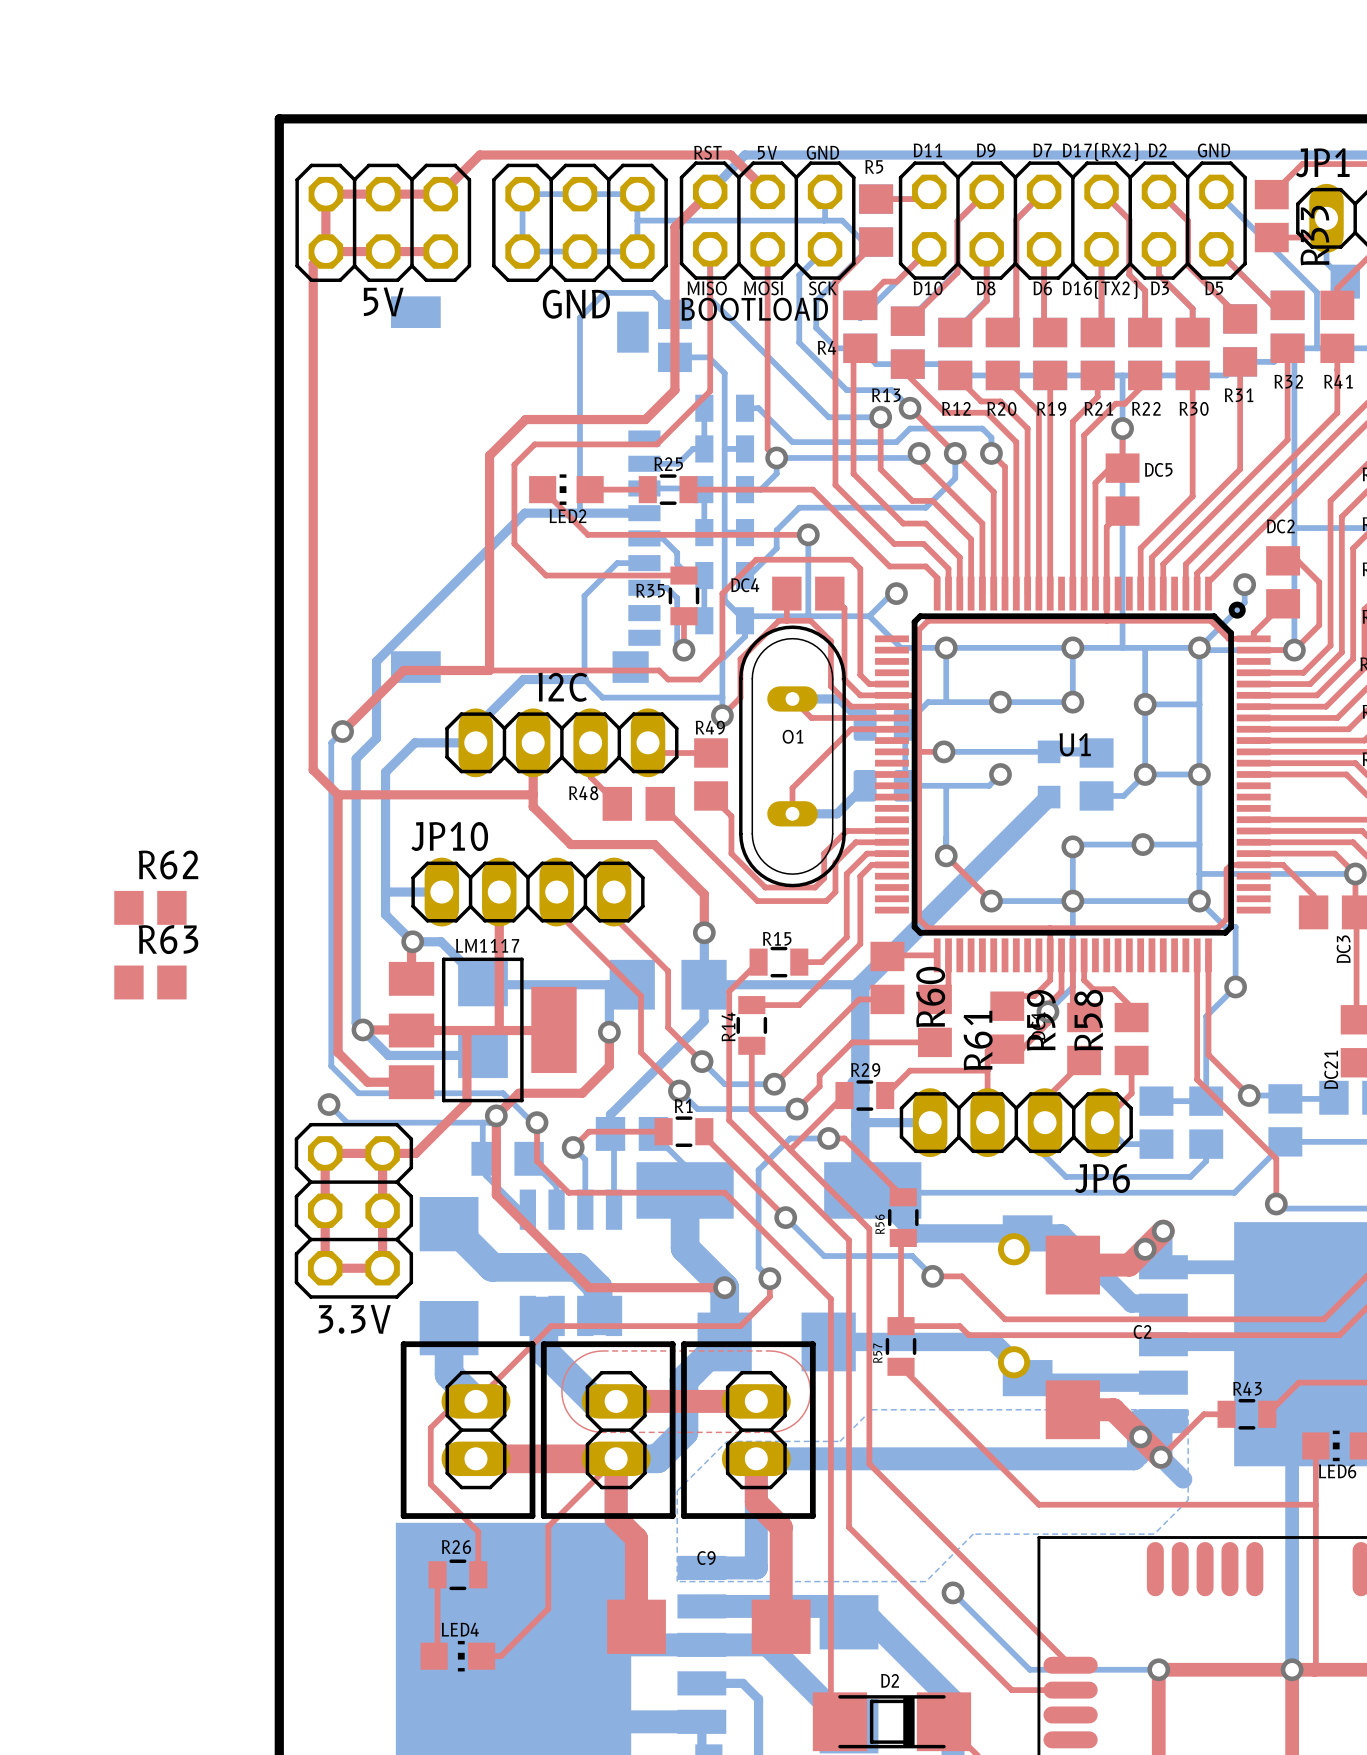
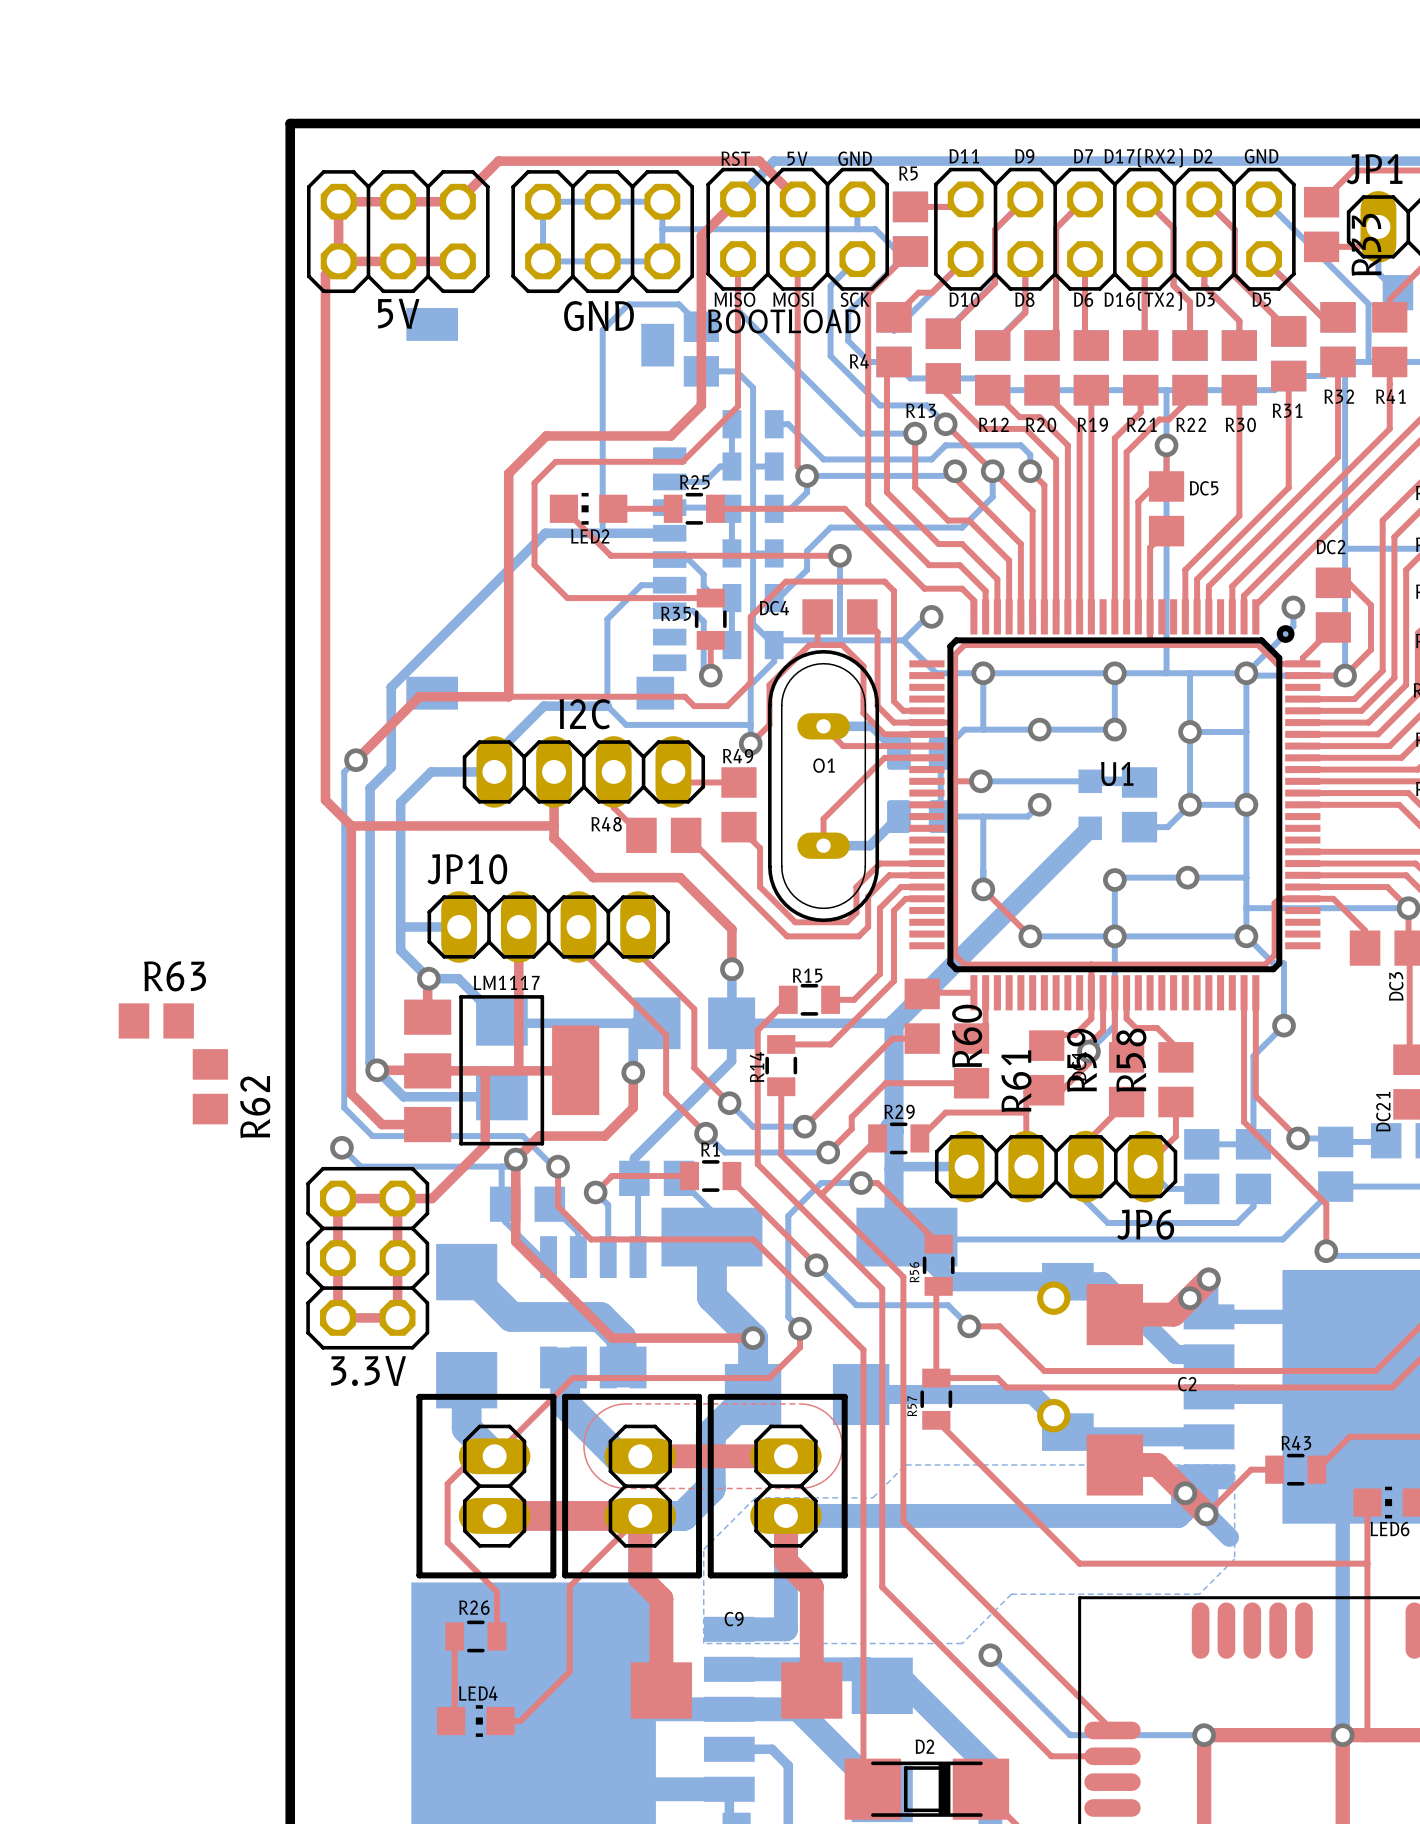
R62 rotation: 0° (150, 907) -> 90° clockwise (210, 1086)
R62 position: (150, 907) -> (210, 1086)

